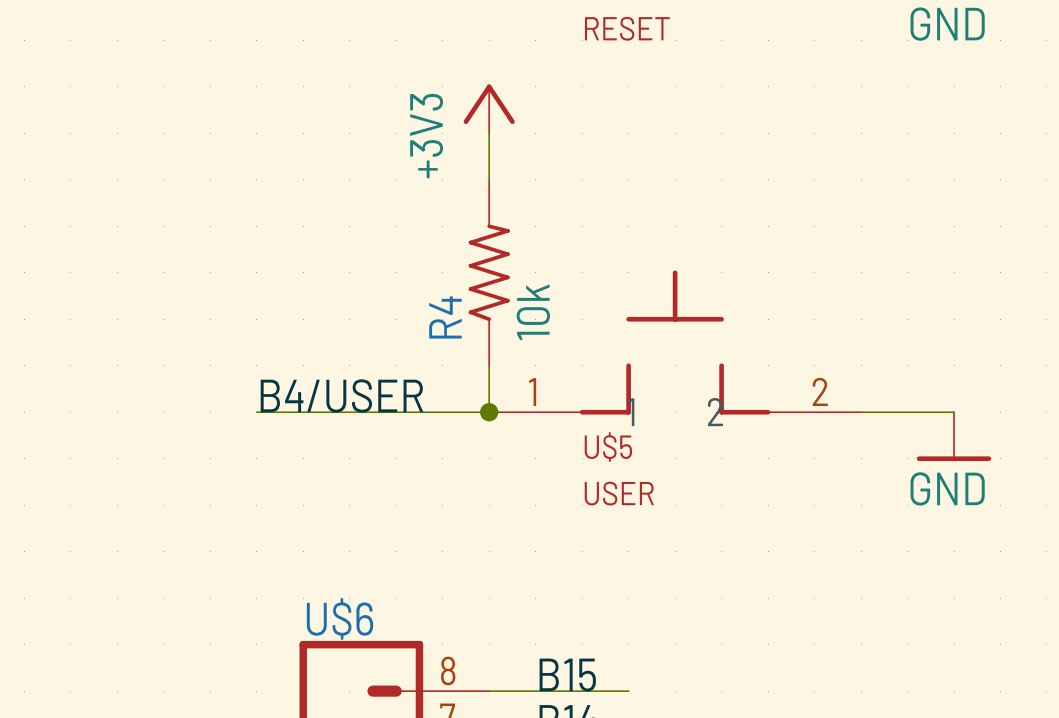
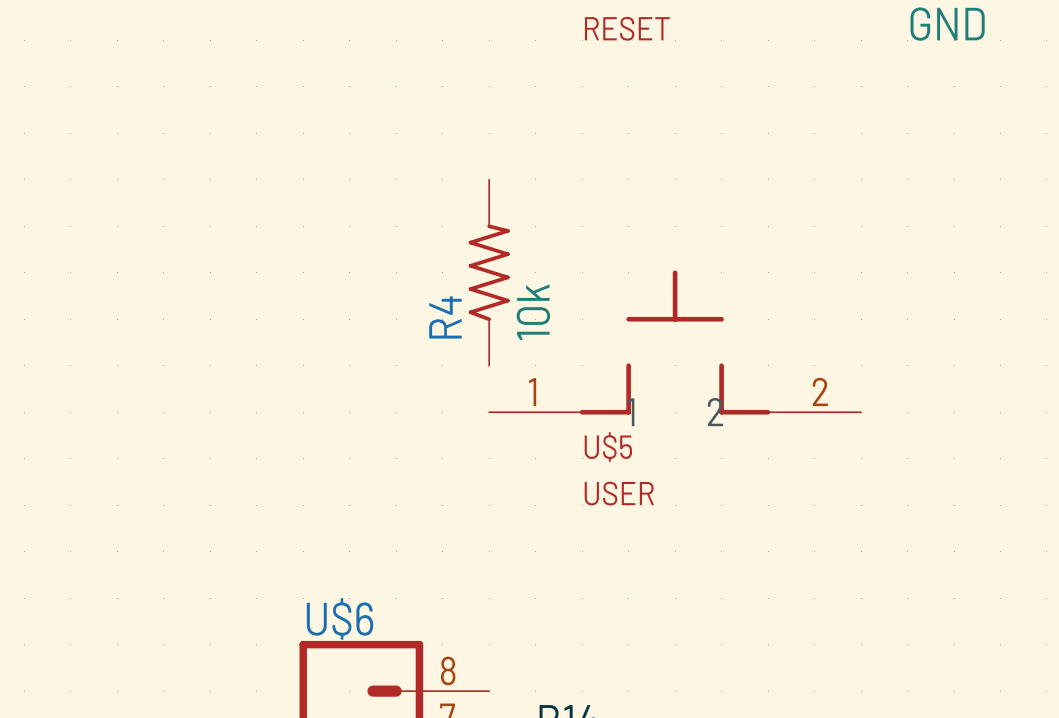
power symbol: +3V3 (489, 108) -> none
wire: (489, 133) (489, 179) -> none
wire: (489, 365) (489, 412) (256, 412) -> none
label: B4/USER (341, 395) -> none
junction: (489, 412) -> none
wire: (861, 412) (954, 412) -> none
power symbol: GND (954, 436) -> none
label: B15 (567, 675) -> none
wire: (489, 691) (628, 691) -> none

